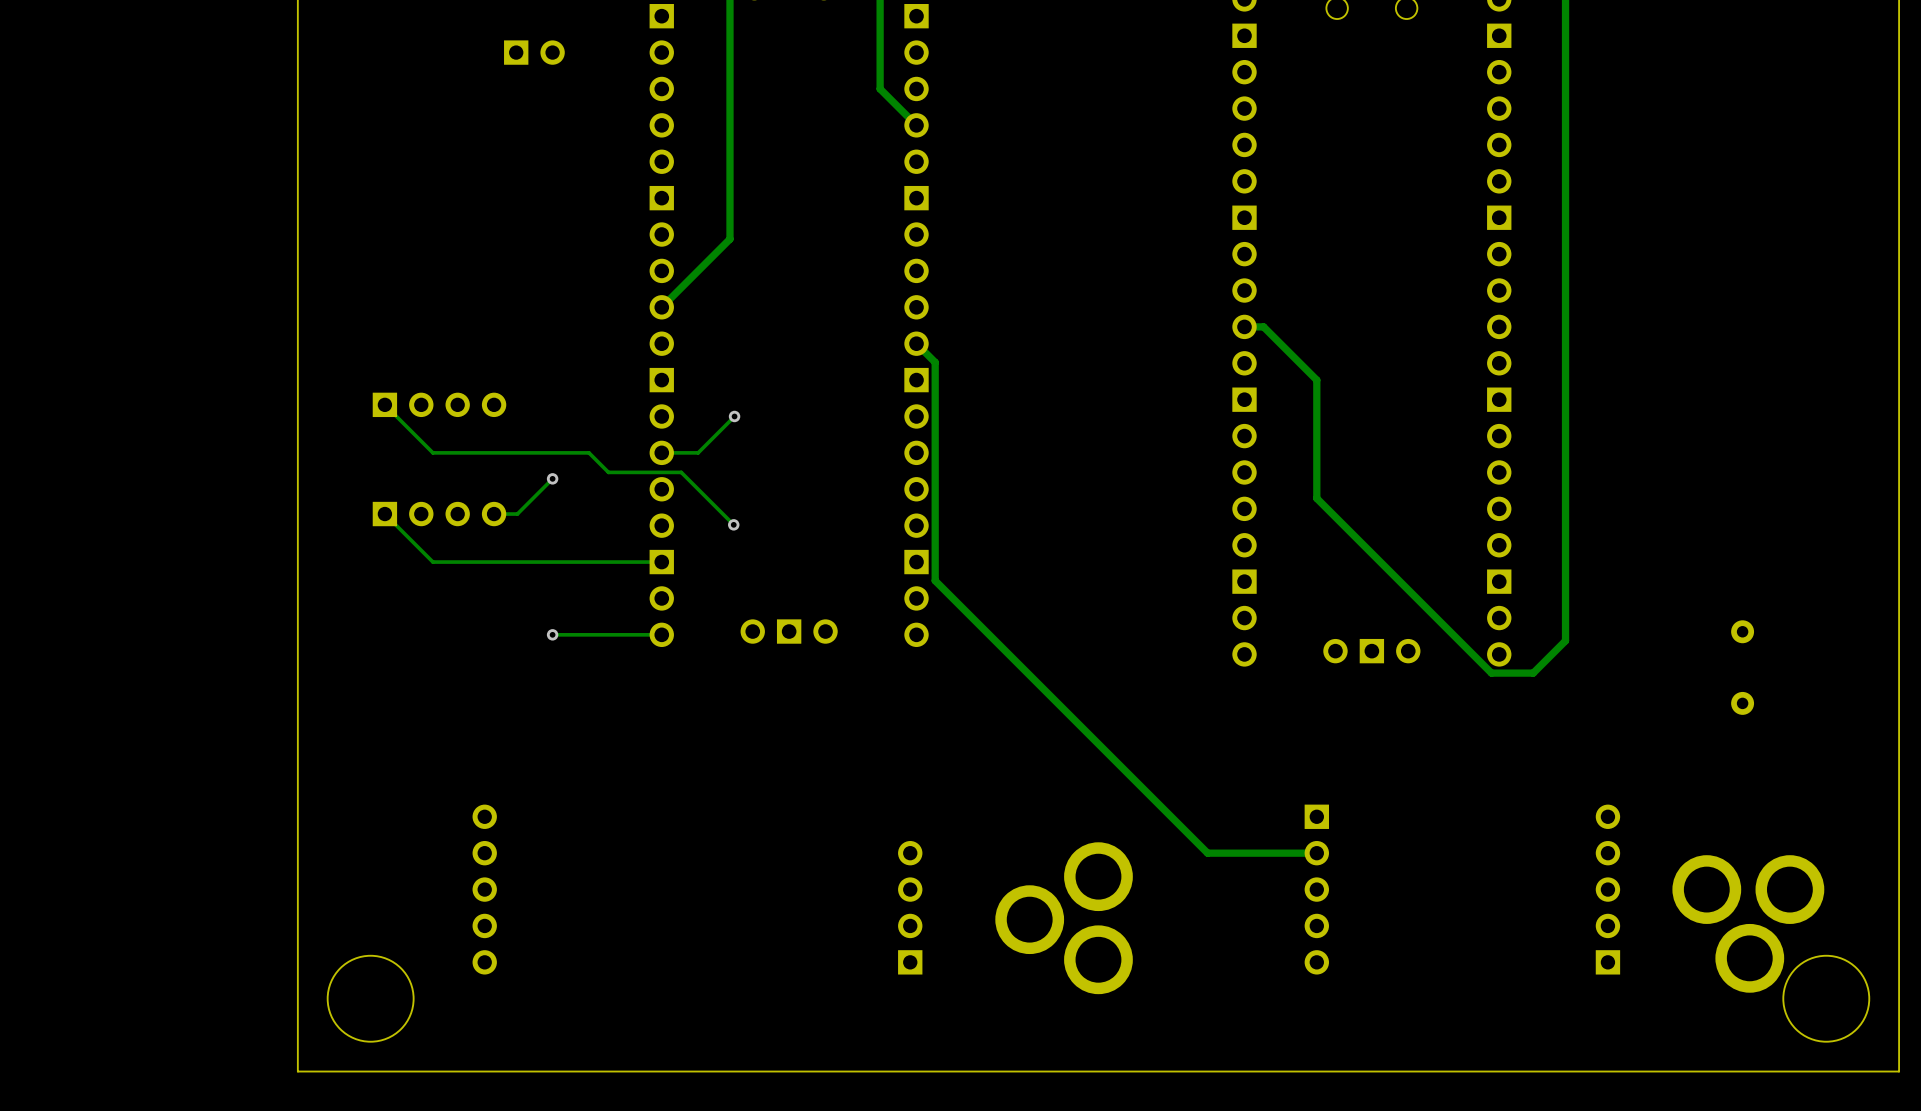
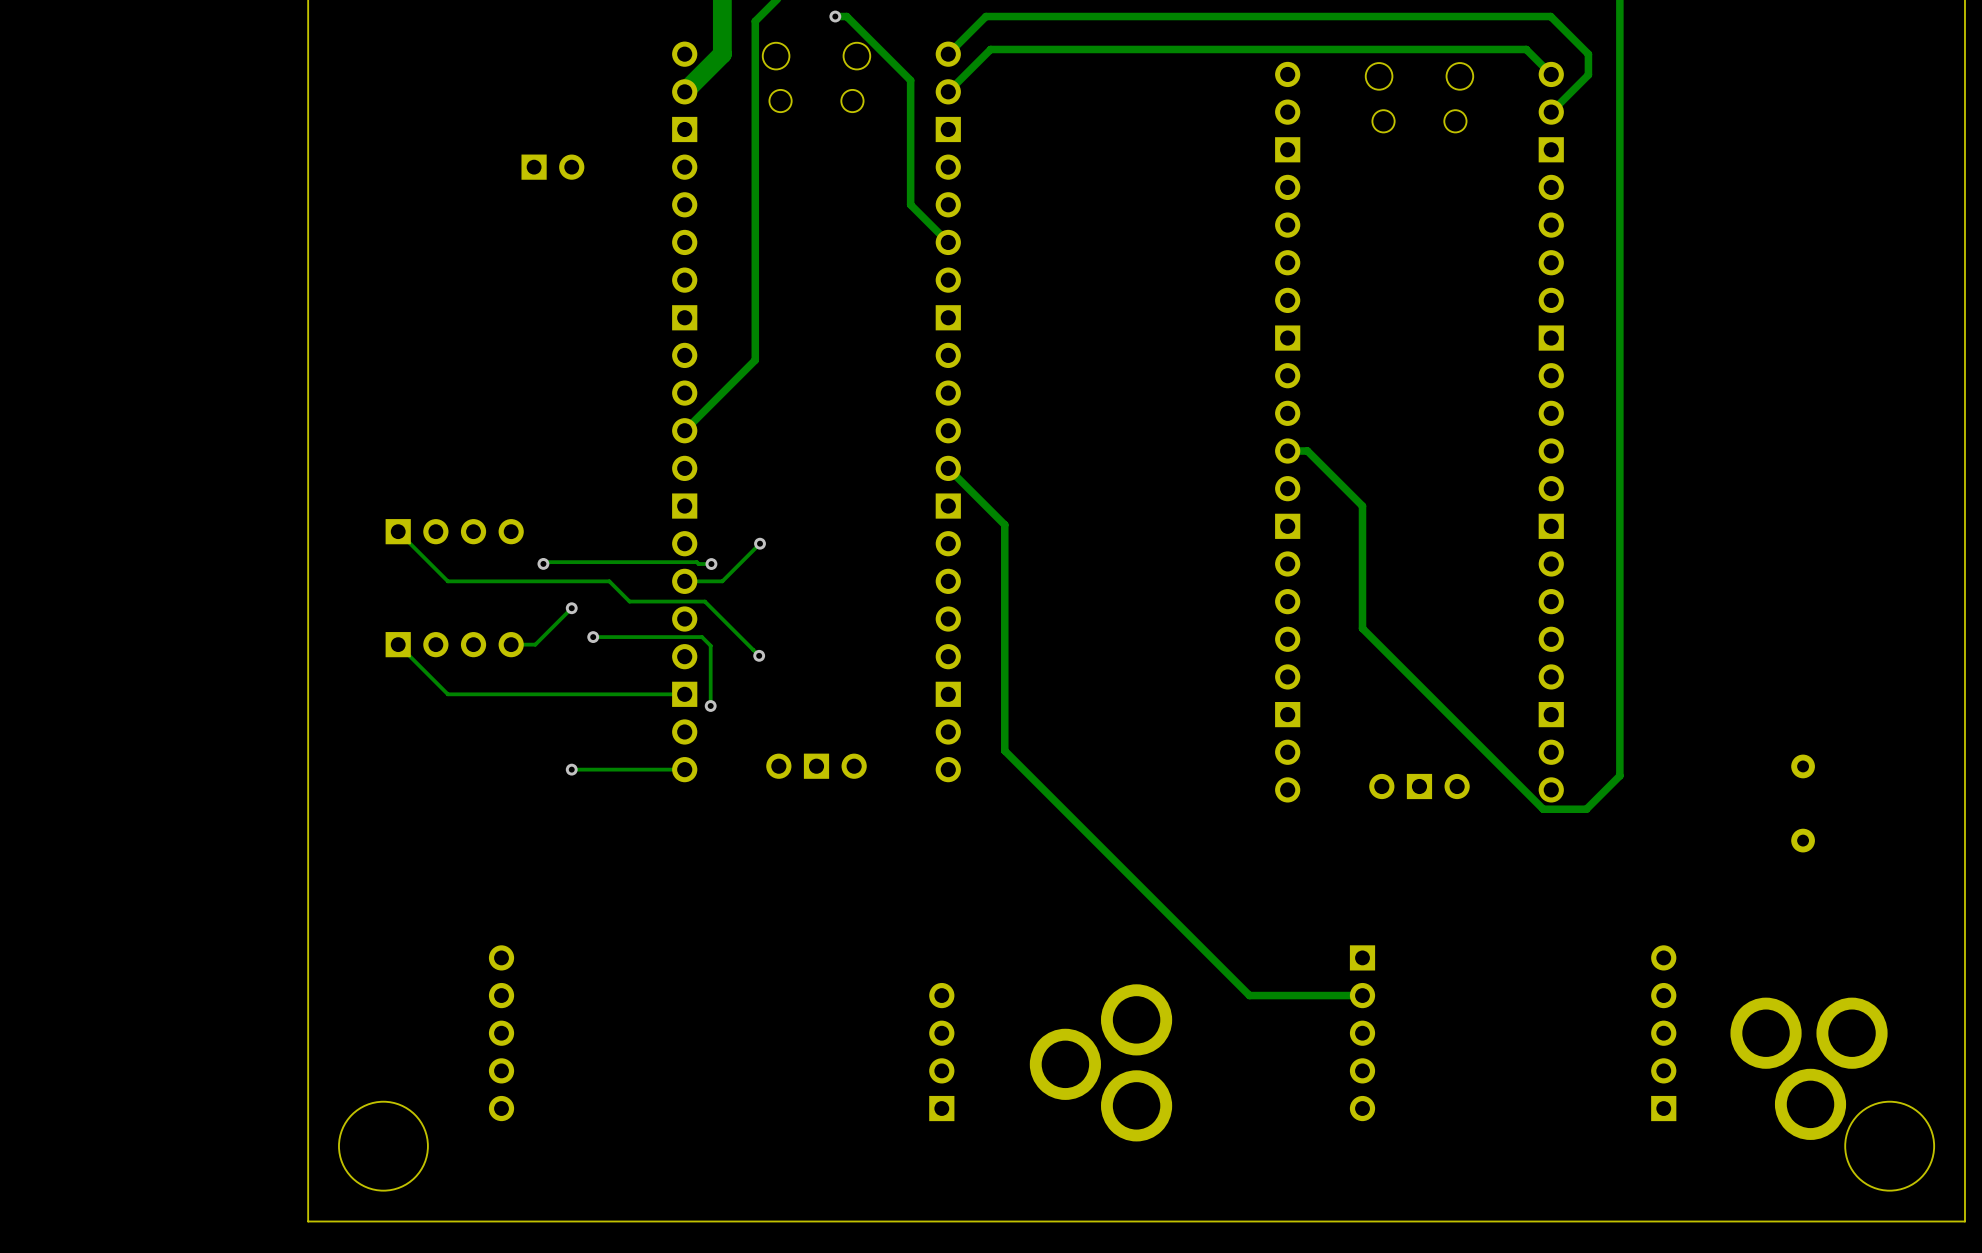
track: (935, 362) (935, 580) (971, 616) -> (967, 487) (1004, 524) (1004, 750)
track: none -> (543, 563) (545, 562) (696, 562) (698, 564) (711, 564)
via: none -> (543, 563)
via: none -> (711, 564)
track: none -> (593, 637) (702, 637) (710, 645) (710, 705)
via: none -> (593, 637)
via: none -> (710, 705)

